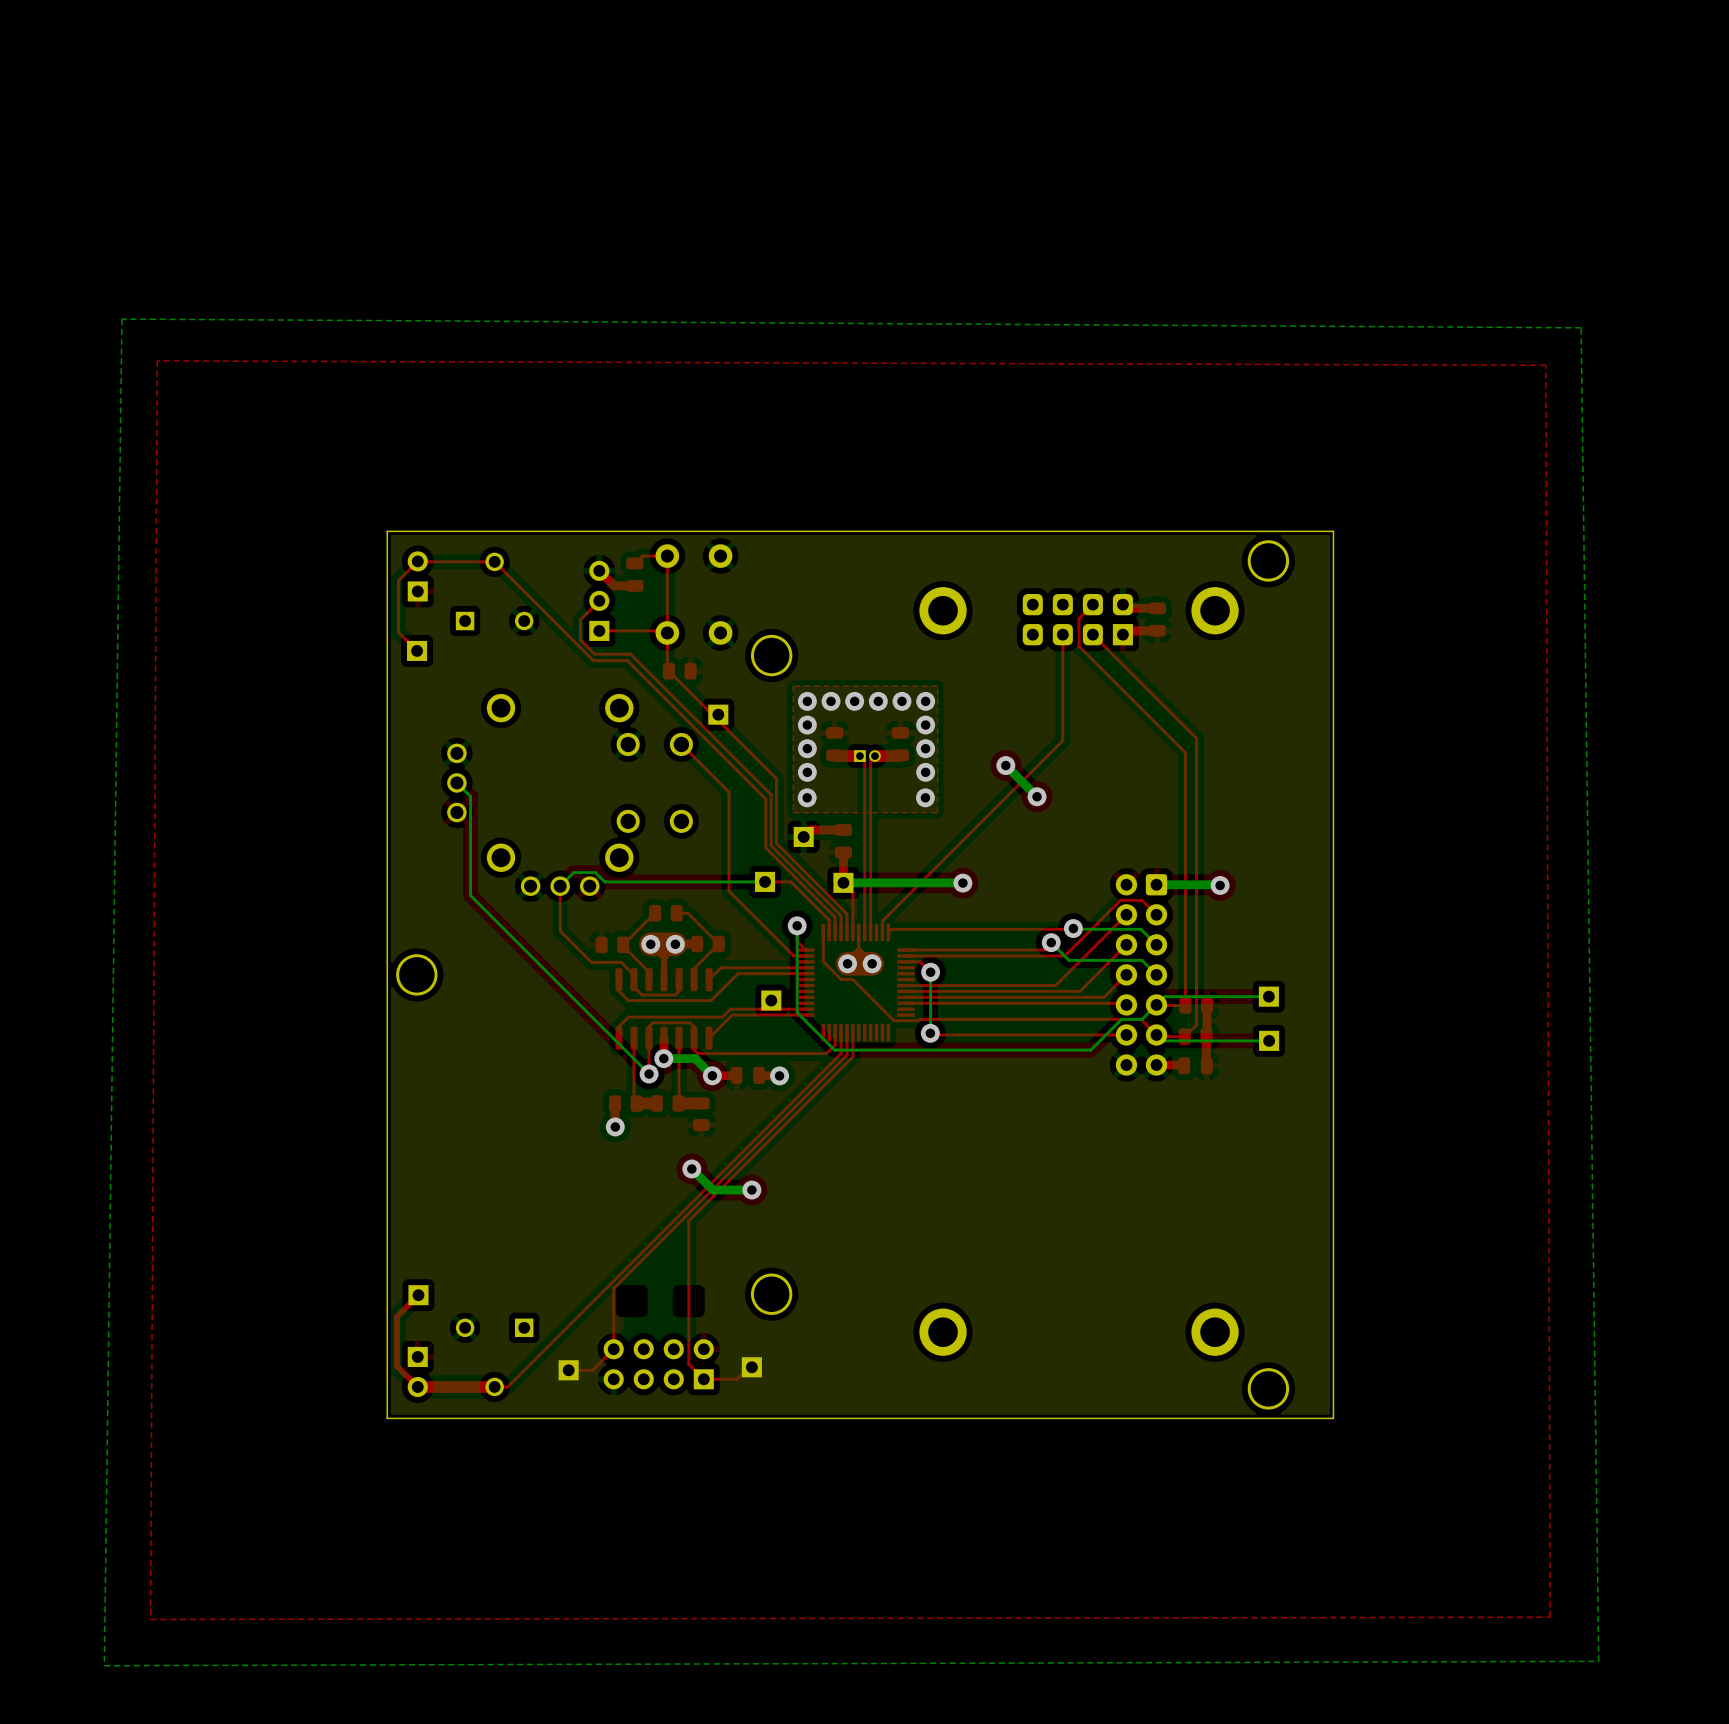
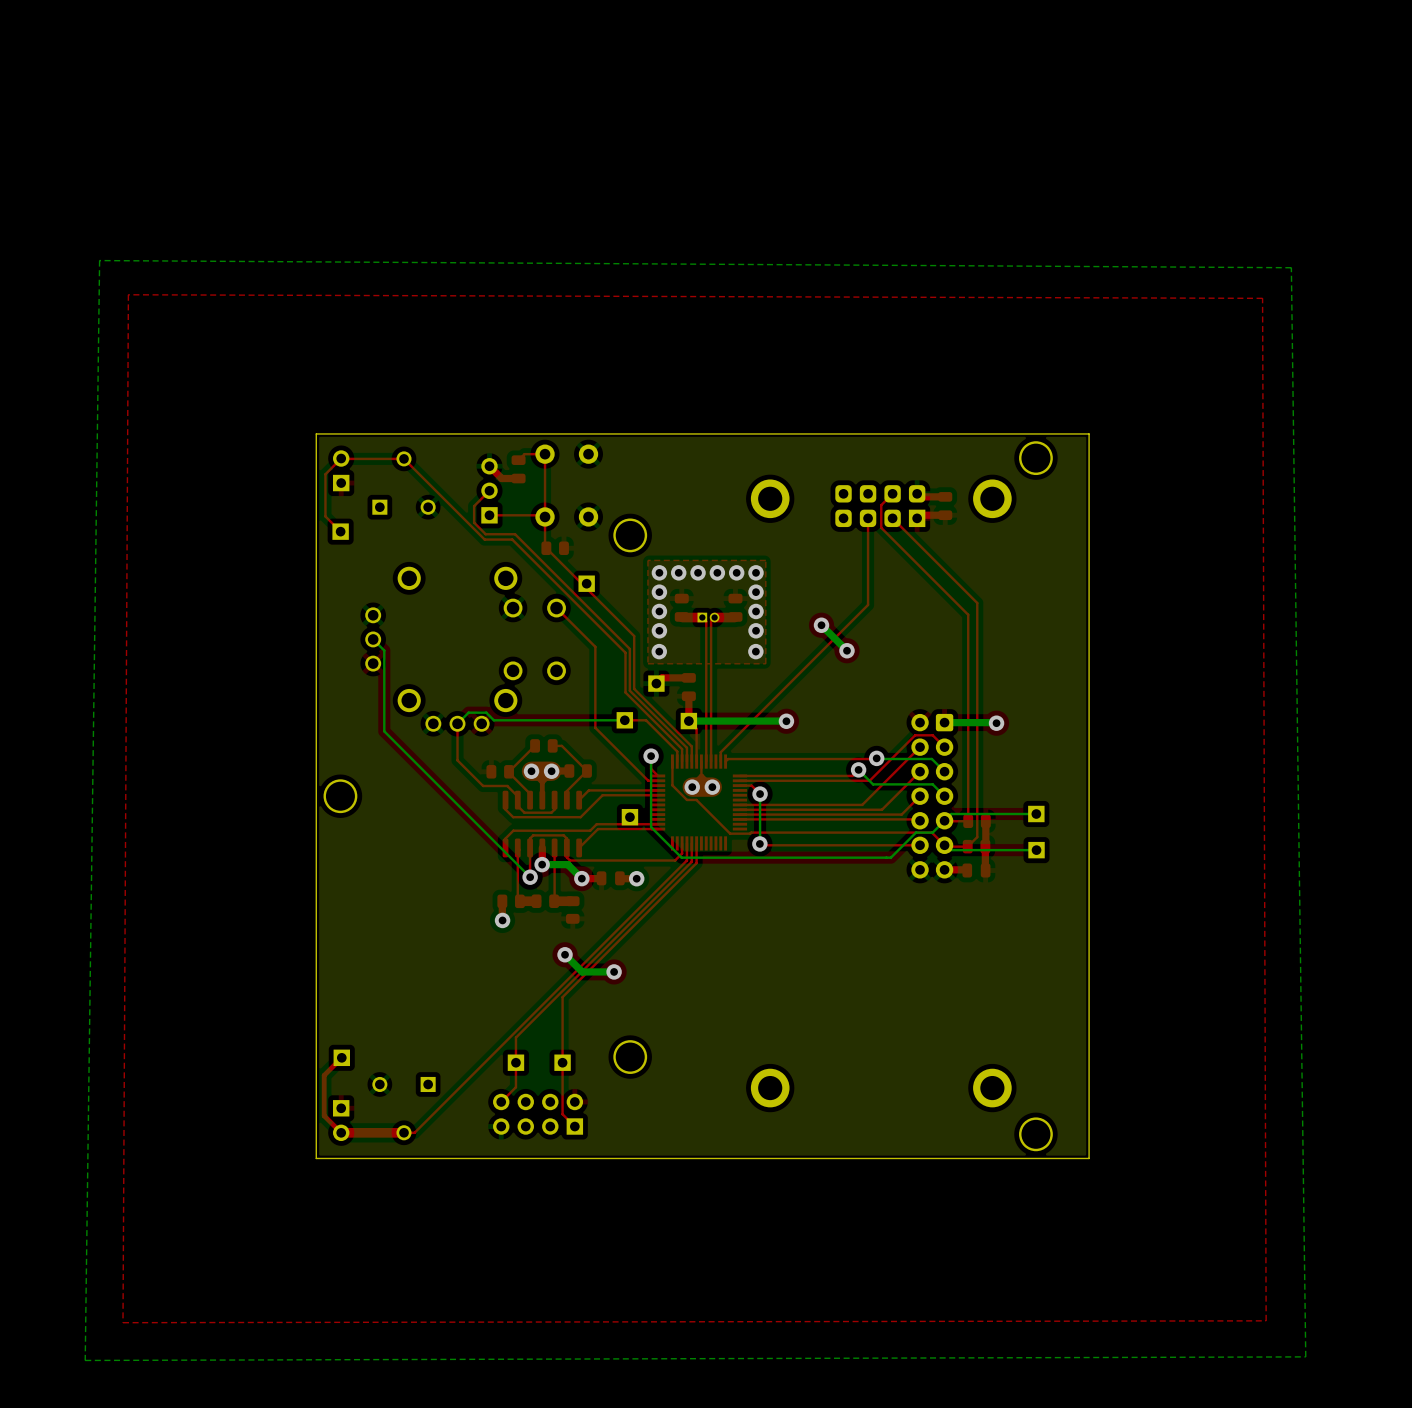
top track: (631, 1270) (613, 1288) (613, 1349) (592, 1370) (568, 1370) -> (515, 1037) (515, 1087) (501, 1101)
part: none -> (515, 1062)
part: none -> (562, 1062)
top track: (751, 1367) (748, 1367) (736, 1379) (703, 1379) -> none
part: (751, 1367) -> none
part: (568, 1370) -> none

